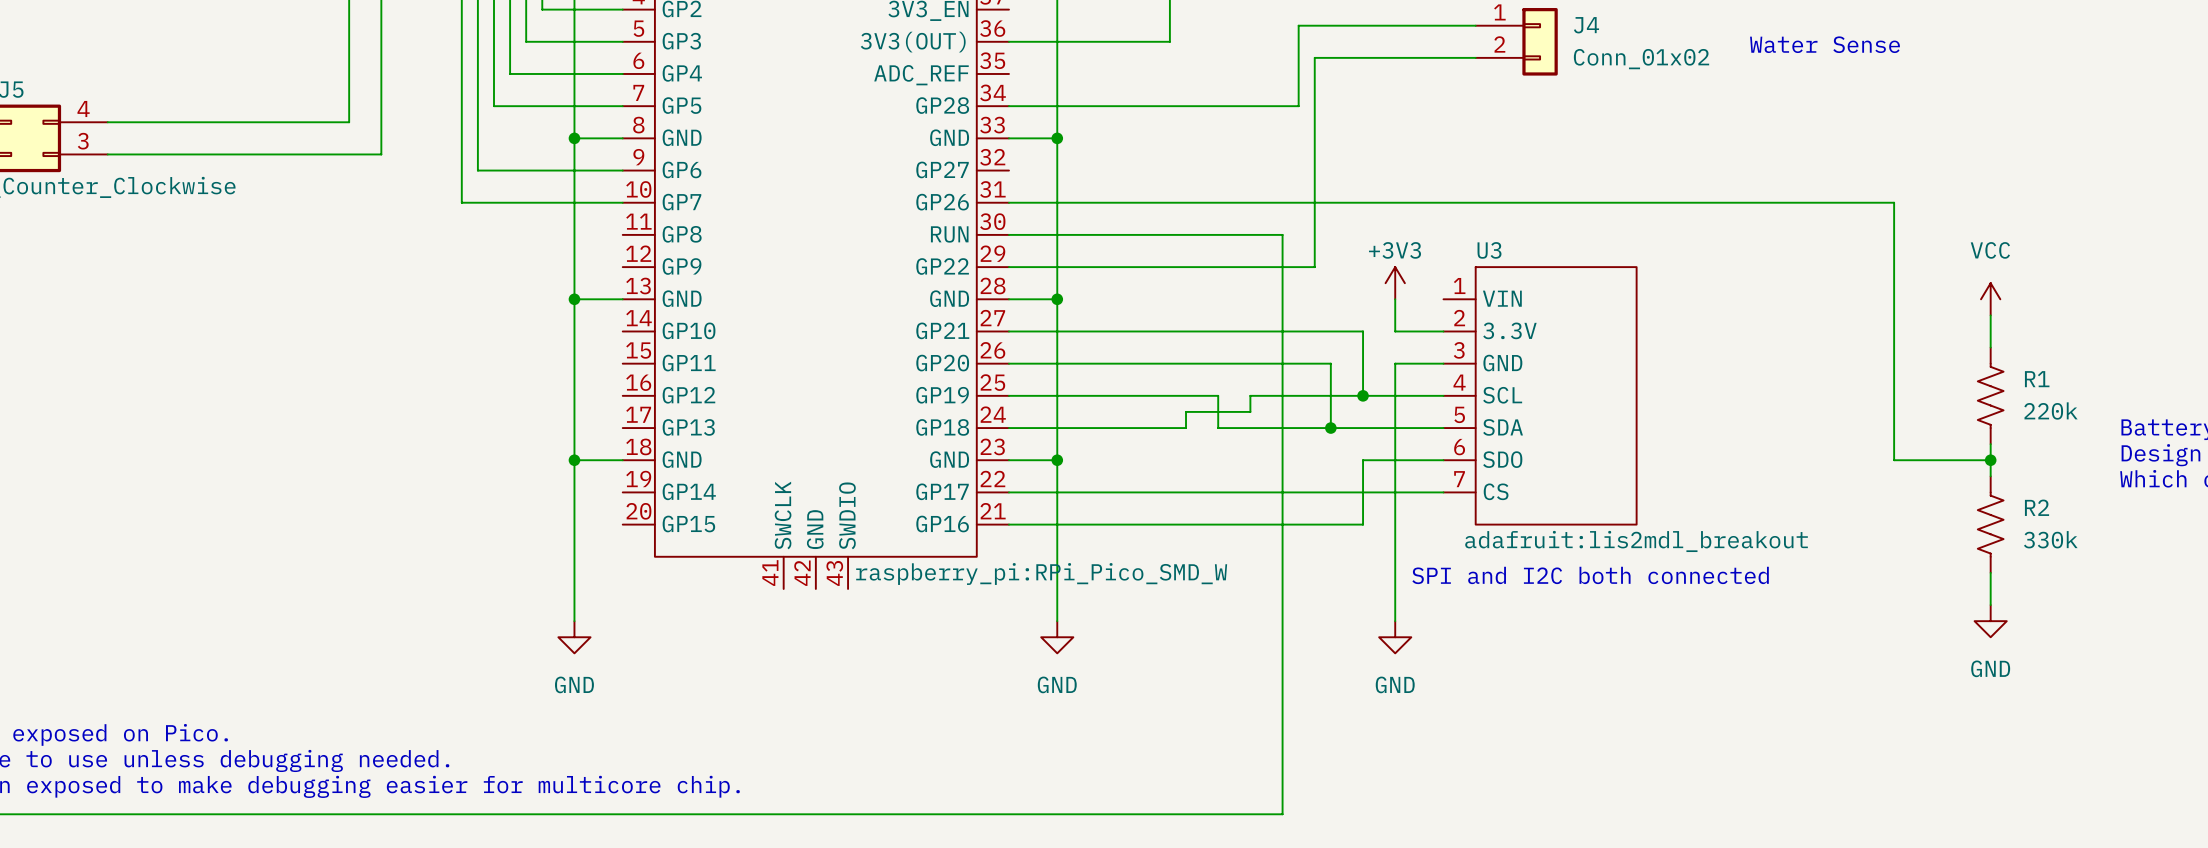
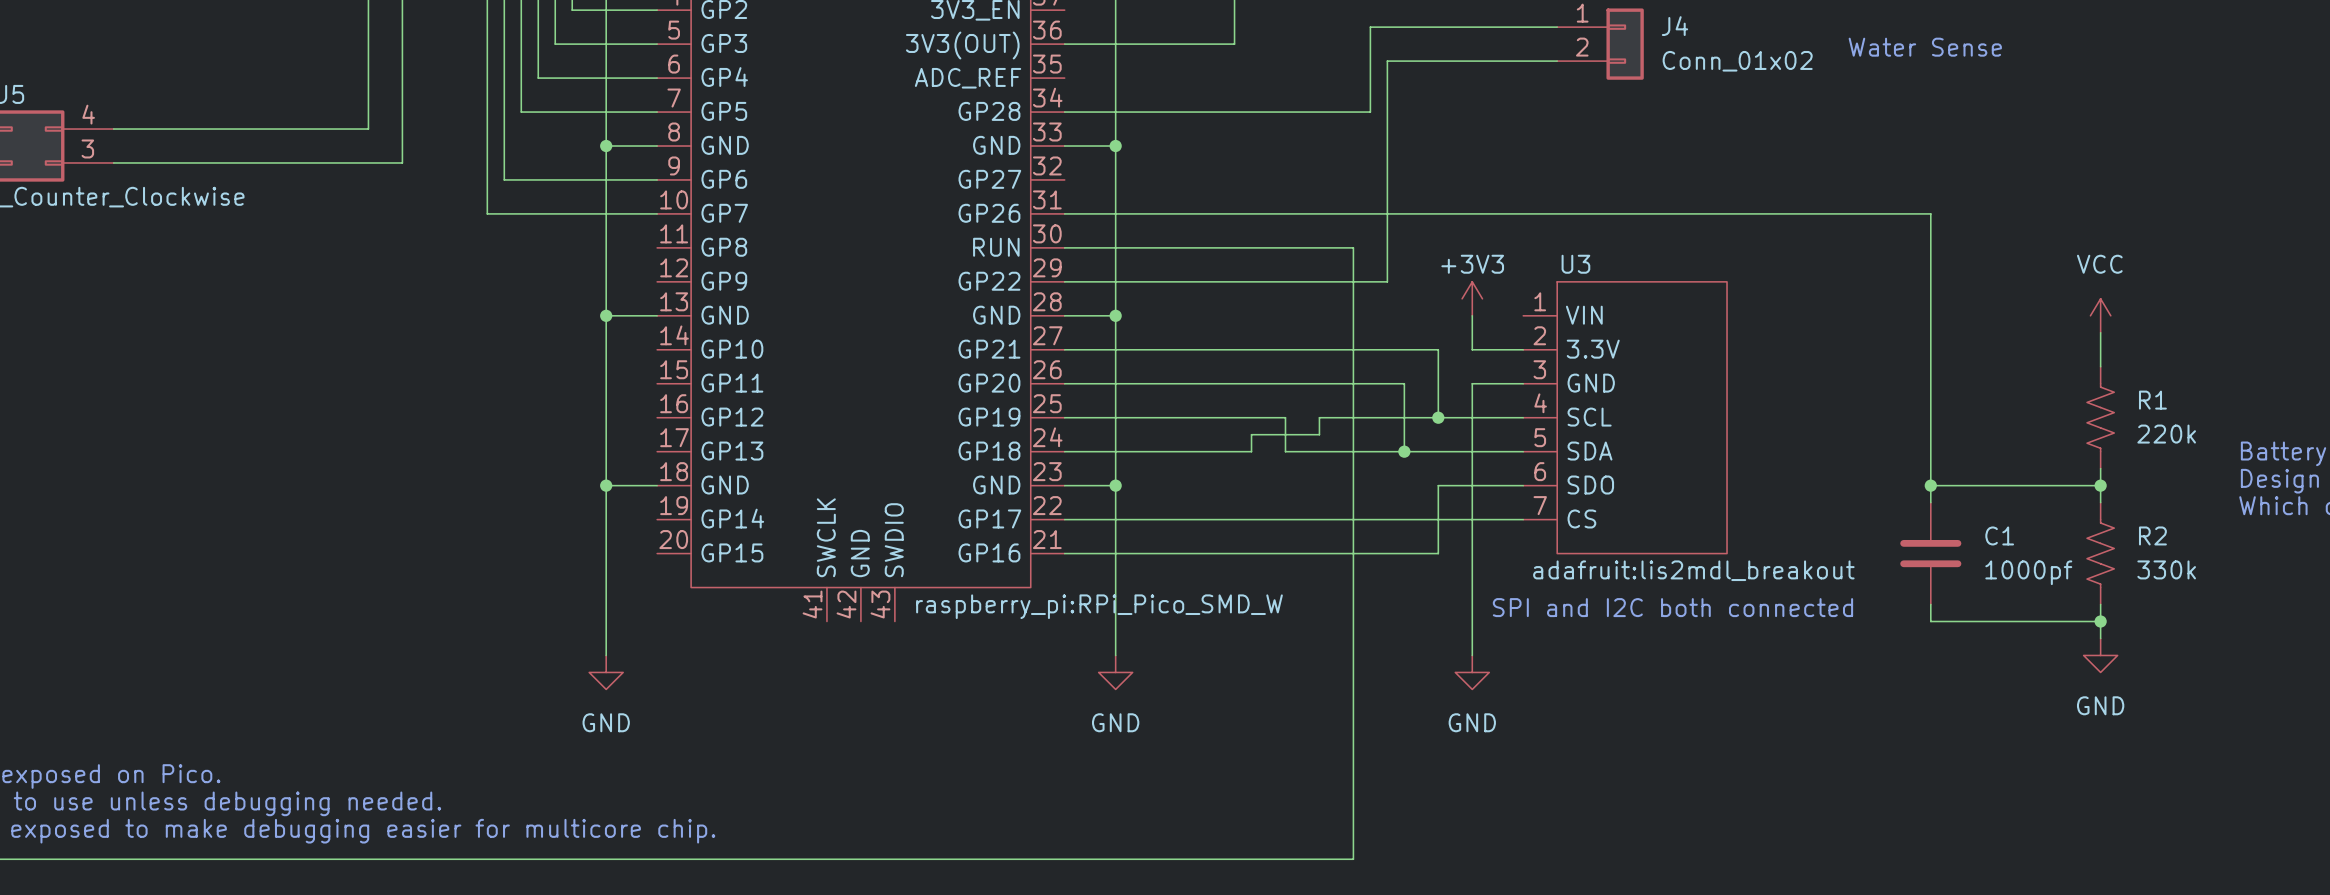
wire: (1829, 202) (1894, 202) (1894, 460) -> (1930, 213) (1930, 502)
wire: none -> (1930, 485) (1998, 485)
junction: none -> (1930, 485)
C1: none -> 1000pf (1930, 553)
U3 text position: adafruit:lis2mdl_breakout (1636, 541) -> adafruit:lis2mdl_breakout (1693, 570)
wire: none -> (1930, 604) (1930, 621) (2100, 621)
junction: none -> (2100, 621)

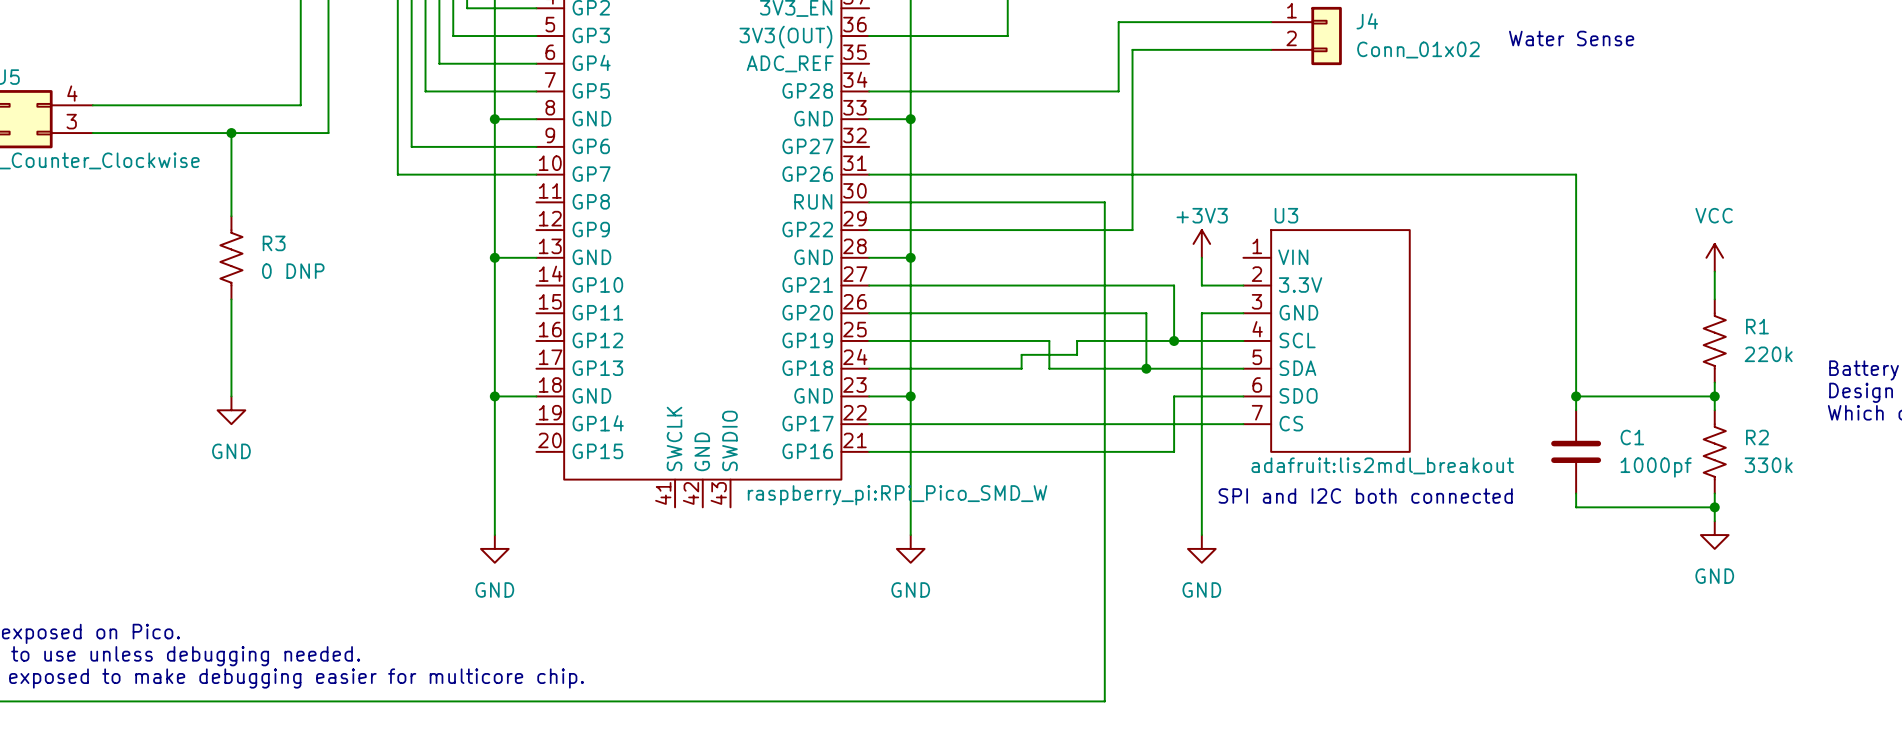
wire: none -> (231, 133) (231, 216)
junction: none -> (231, 133)
R3: none -> 0 DNP (231, 257)
wire: none -> (231, 299) (231, 396)
power symbol: none -> GND (231, 410)

